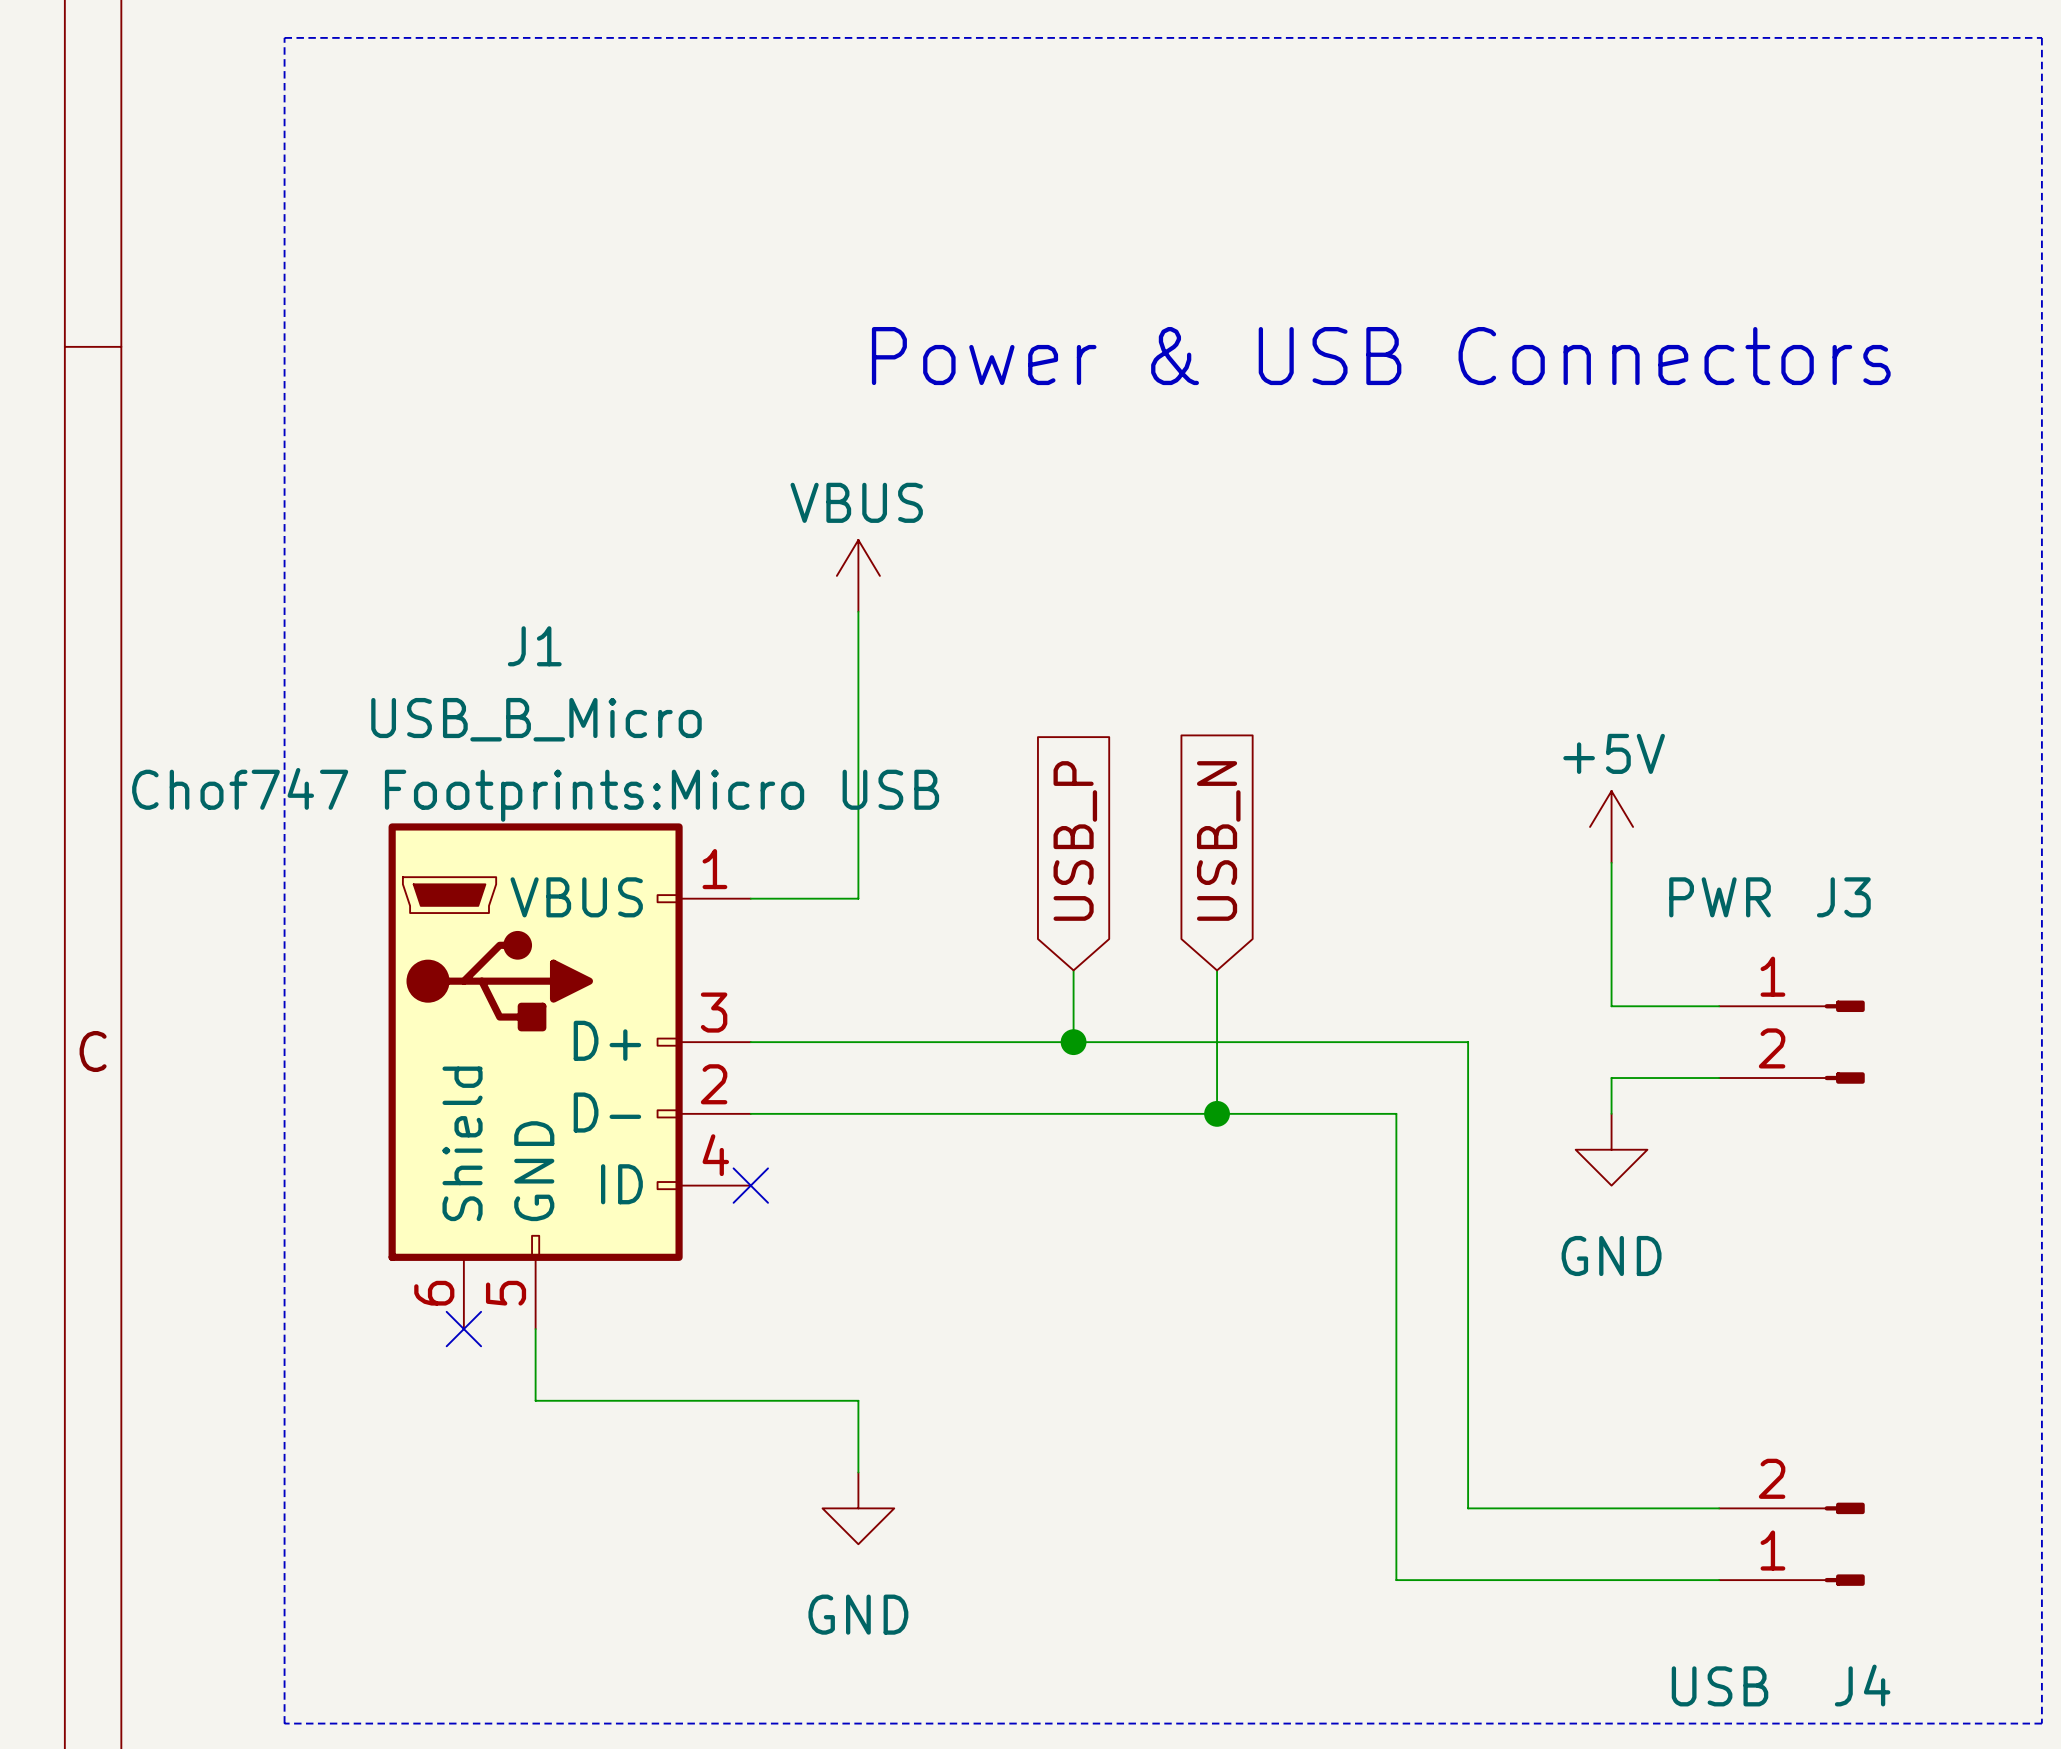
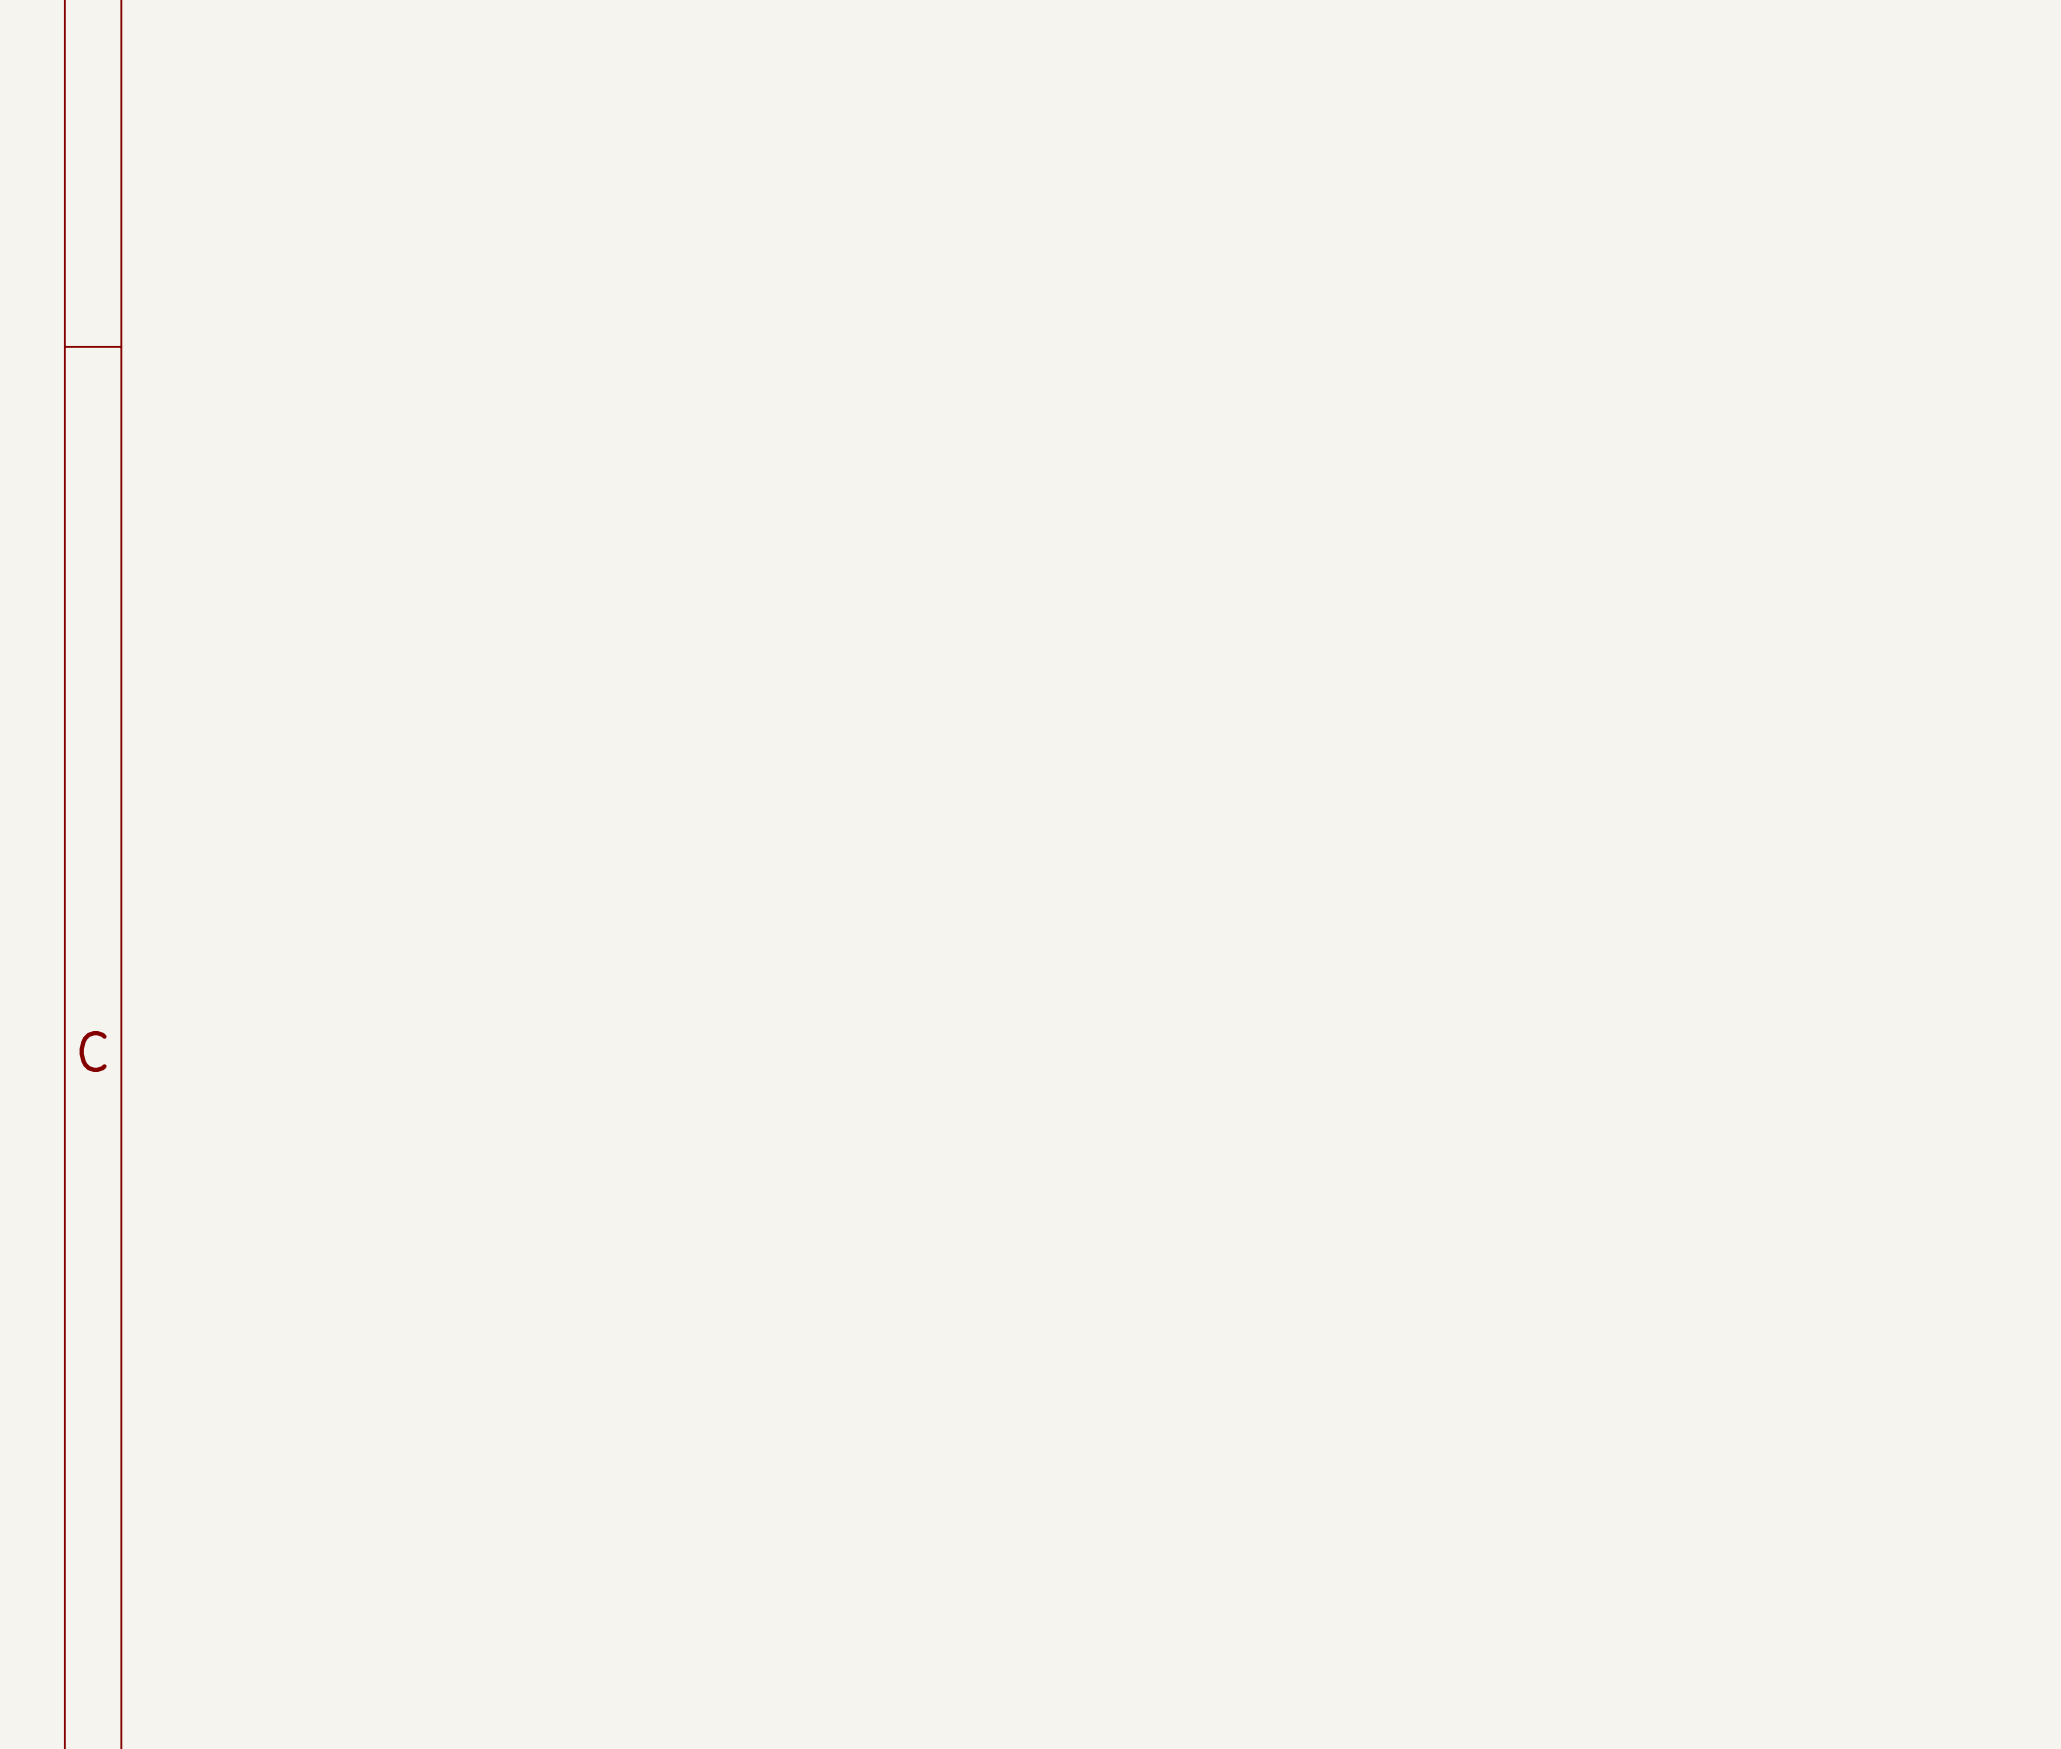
line: (284, 37) (2041, 37) (2041, 1723) (284, 1723) (284, 37) -> none
text: Power & USB Connectors (1381, 356) -> none
power symbol: VBUS (858, 575) -> none
wire: (858, 611) (858, 898) (750, 898) -> none
power symbol: +5V (1611, 826) -> none
global label: USB_P (1075, 840) -> none
global label: USB_N (1218, 840) -> none
wire: (1611, 862) (1611, 1006) (1719, 1006) -> none
wire: (1073, 970) (1073, 1042) -> none
wire: (1217, 970) (1217, 1113) -> none
wire: (750, 1042) (1468, 1042) (1468, 1508) (1719, 1508) -> none
junction: (1073, 1042) -> none
J3: PWR (1791, 1042) -> none
J1: USB_B_Micro (569, 1076) -> none
wire: (1719, 1078) (1611, 1078) (1611, 1113) -> none
wire: (750, 1113) (1396, 1113) (1396, 1580) (1719, 1580) -> none
junction: (1217, 1113) -> none
power symbol: GND (1611, 1149) -> none
no-connect mark: (750, 1185) -> none
no-connect mark: (463, 1329) -> none
wire: (535, 1329) (535, 1400) (858, 1400) (858, 1472) -> none
power symbol: GND (858, 1508) -> none
J4: USB (1791, 1544) -> none

